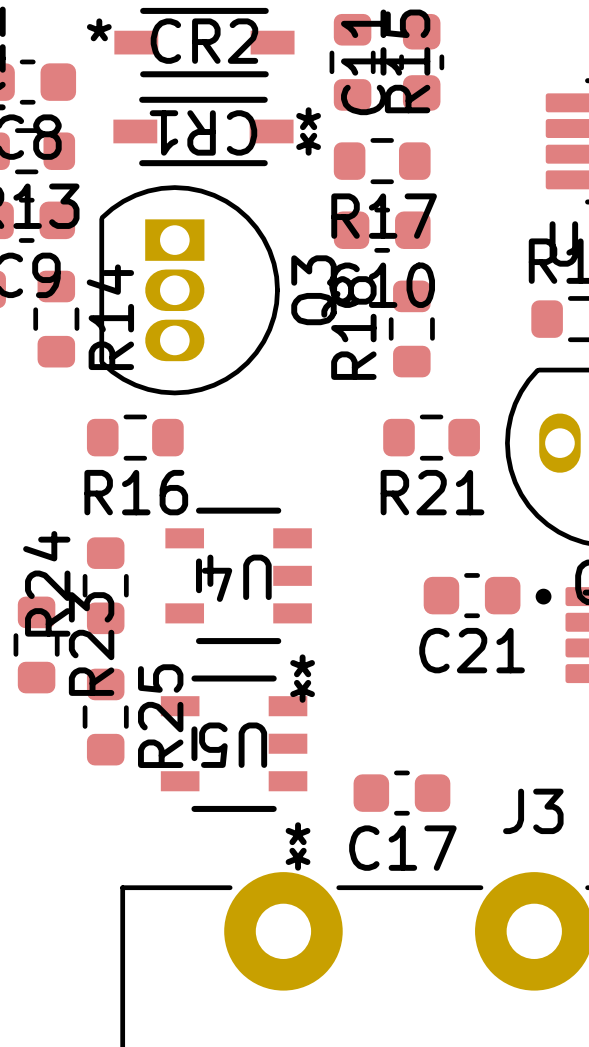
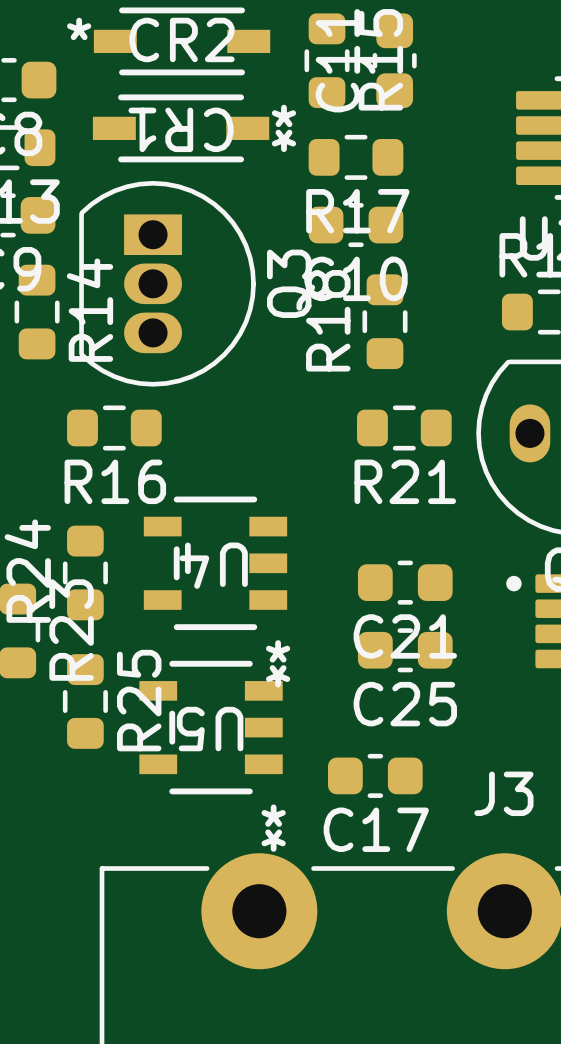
C21 position: (472, 595) -> (405, 582)
C25: none -> (405, 650)

